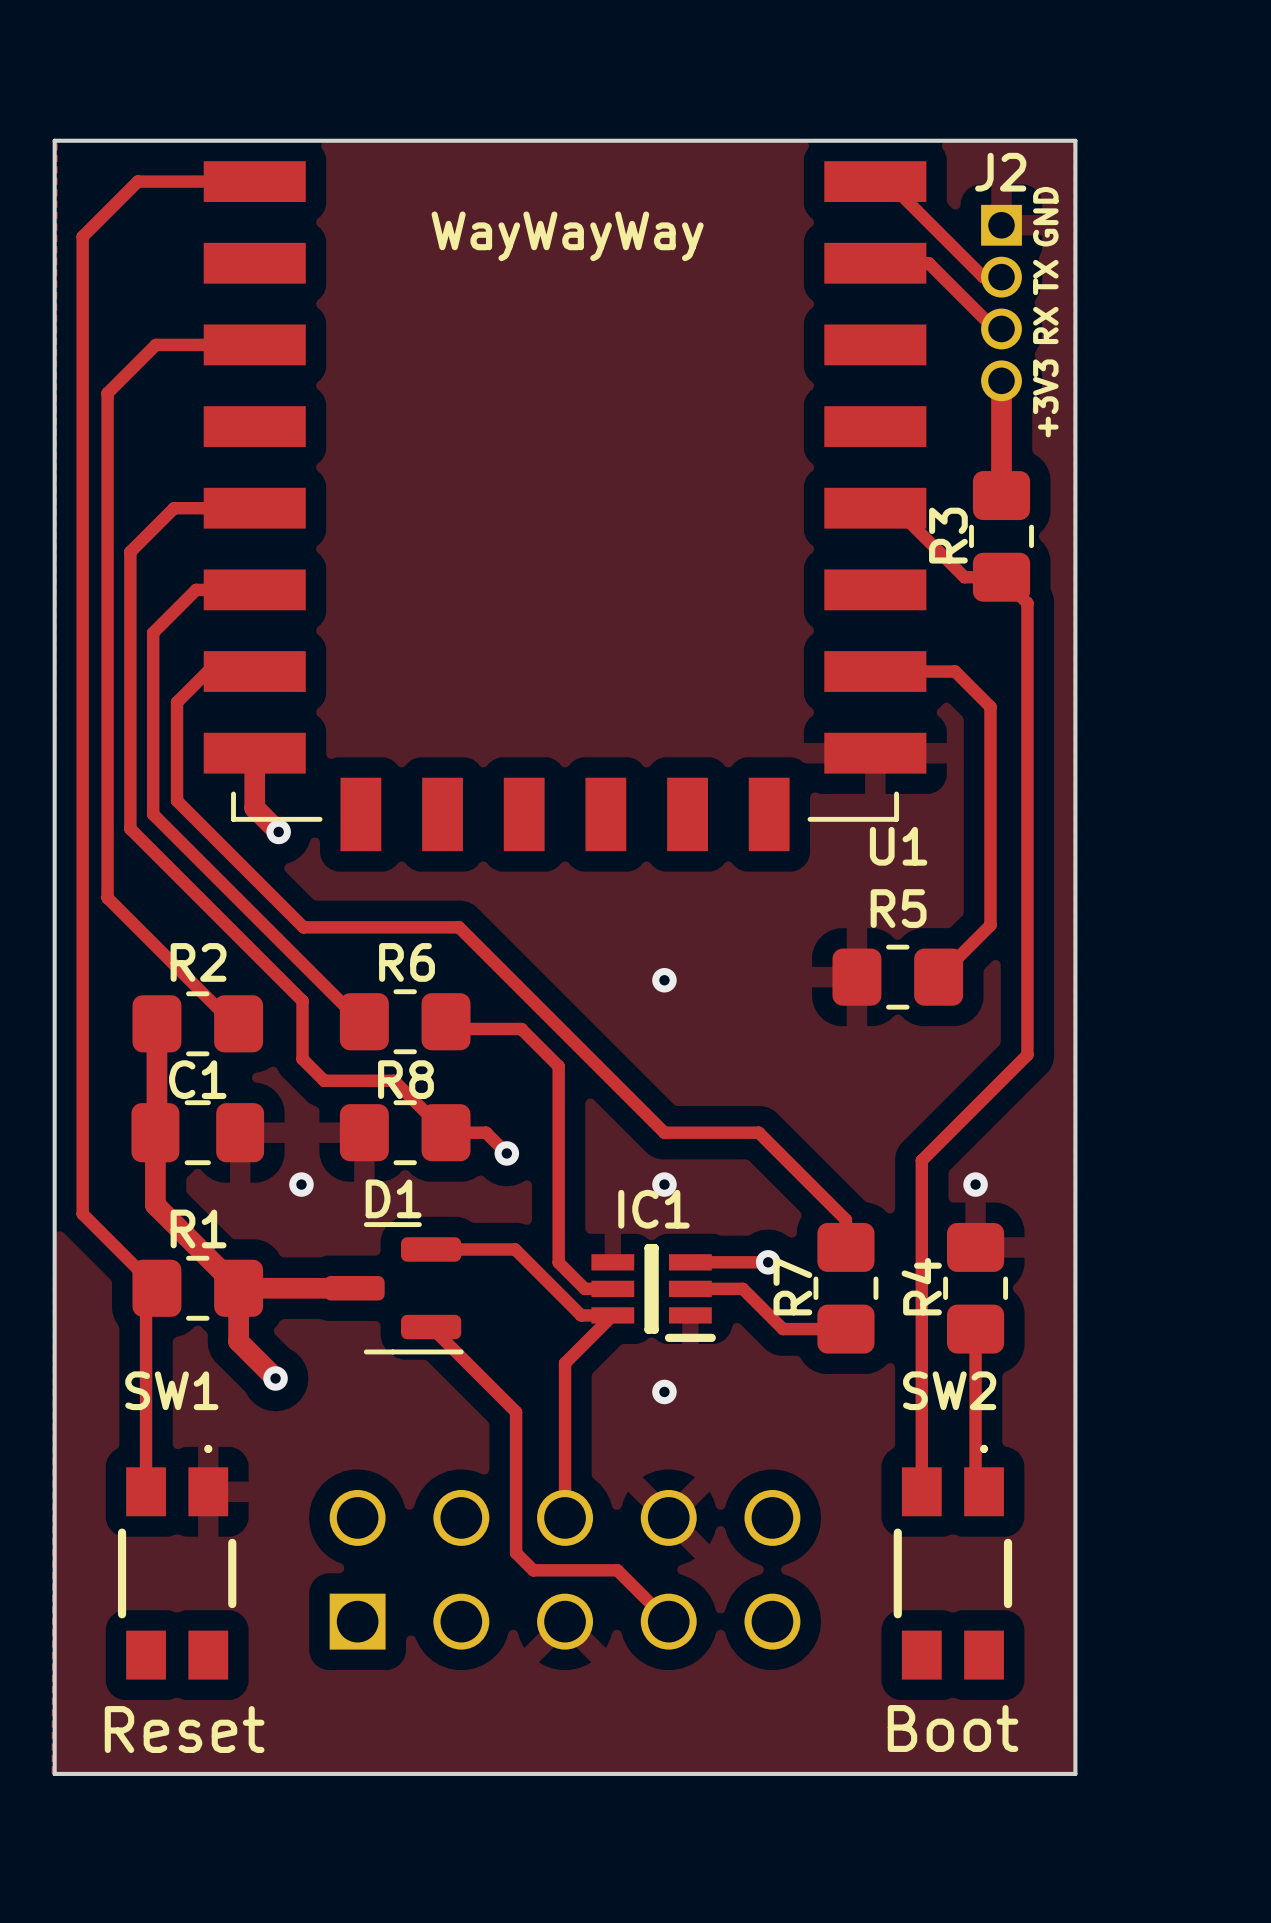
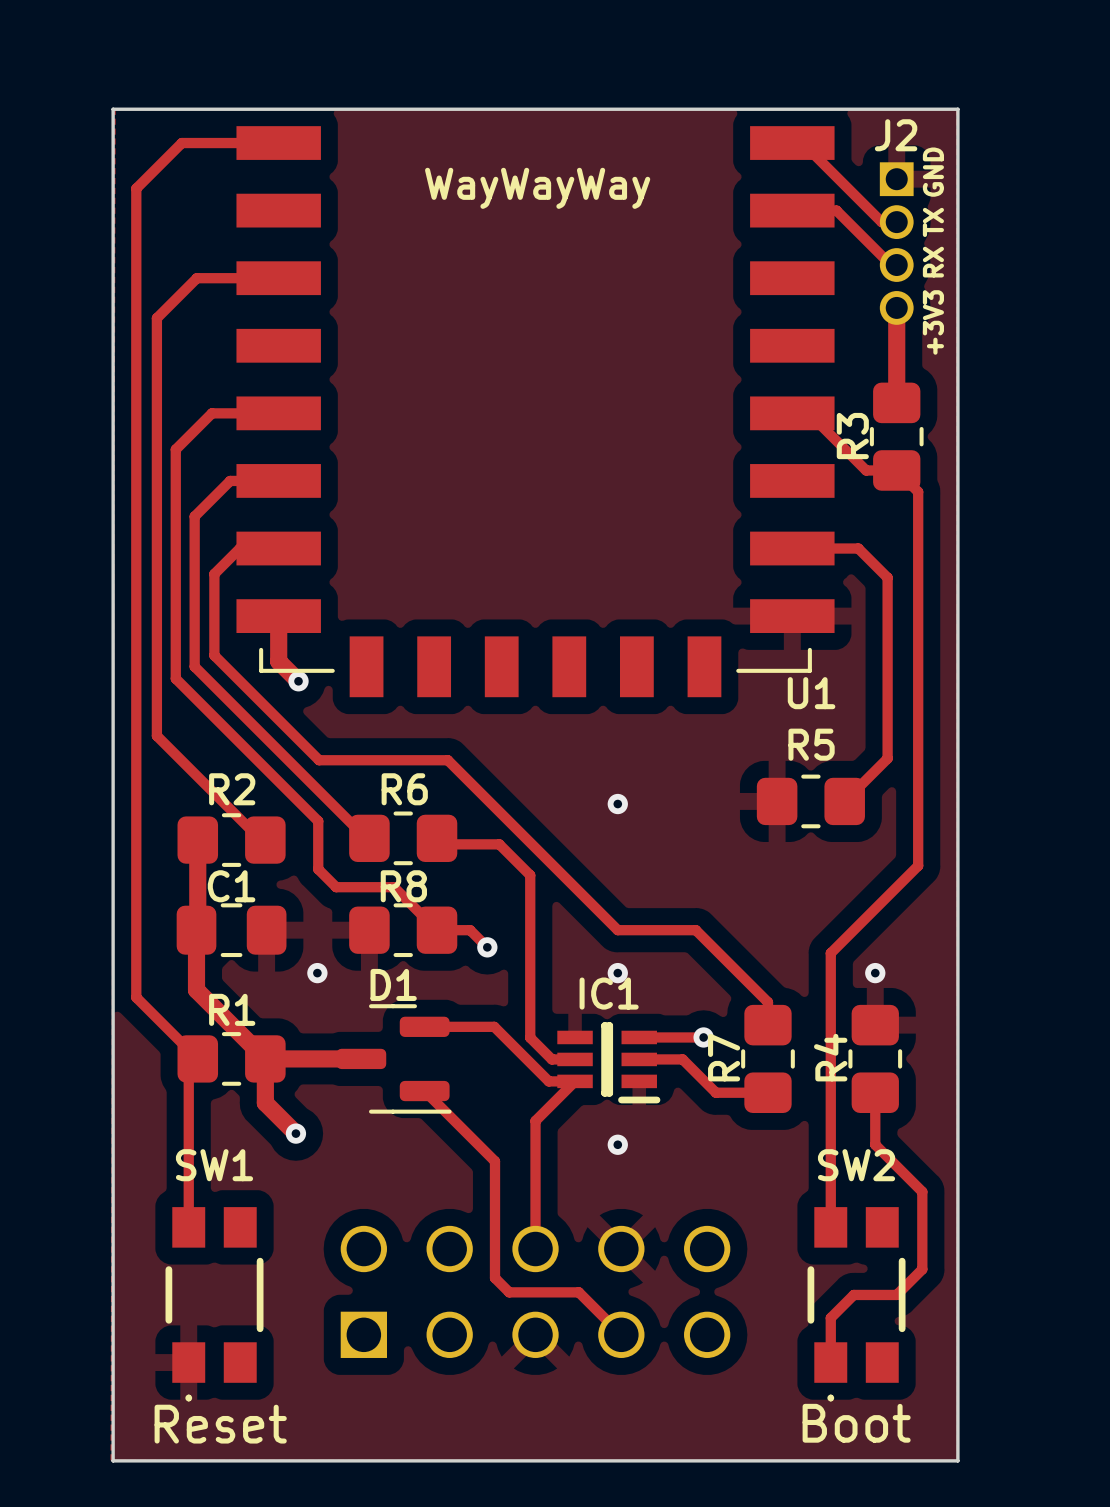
track: (975, 1391) (975, 1483) (984, 1491) -> (875, 1144) (922, 1191) (922, 1269) (896, 1294) (853, 1294) (830, 1318) (830, 1362)
SW1 rotation: 0° (177, 1562) -> 180° (214, 1304)
SW2 rotation: 0° (952, 1562) -> 180° (856, 1304)

